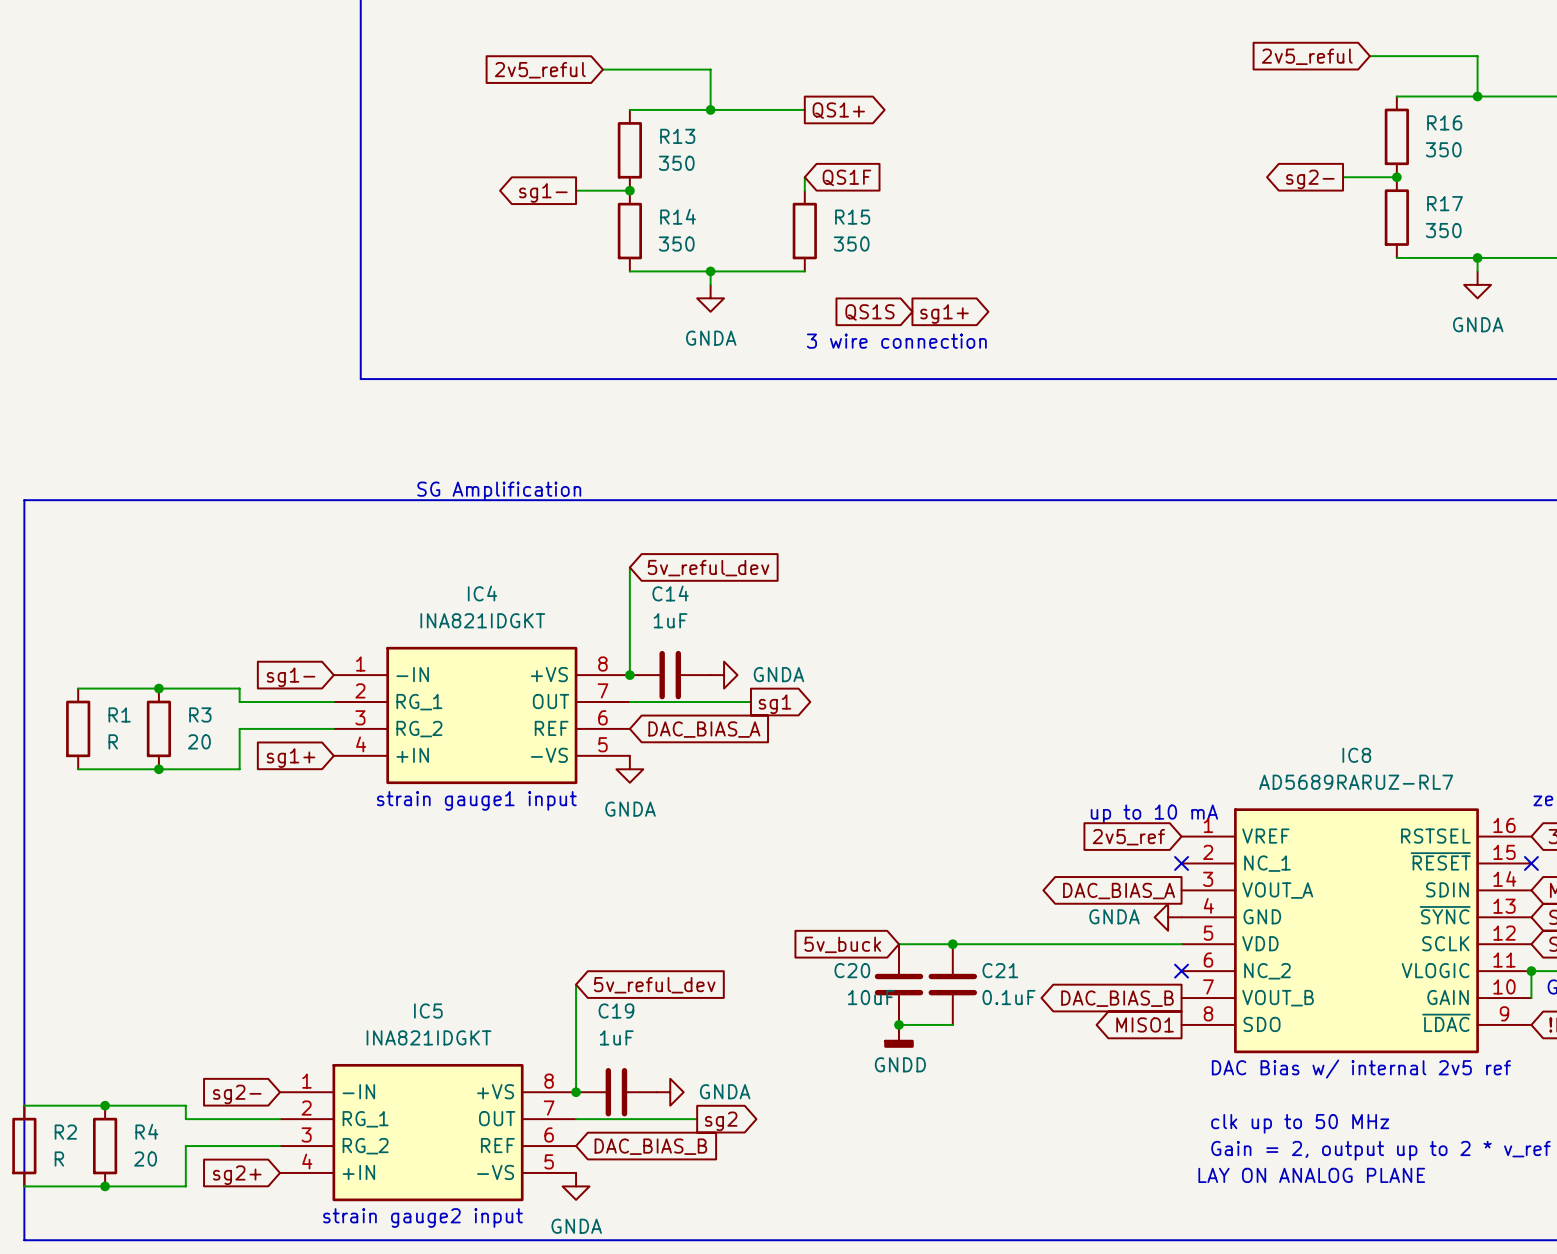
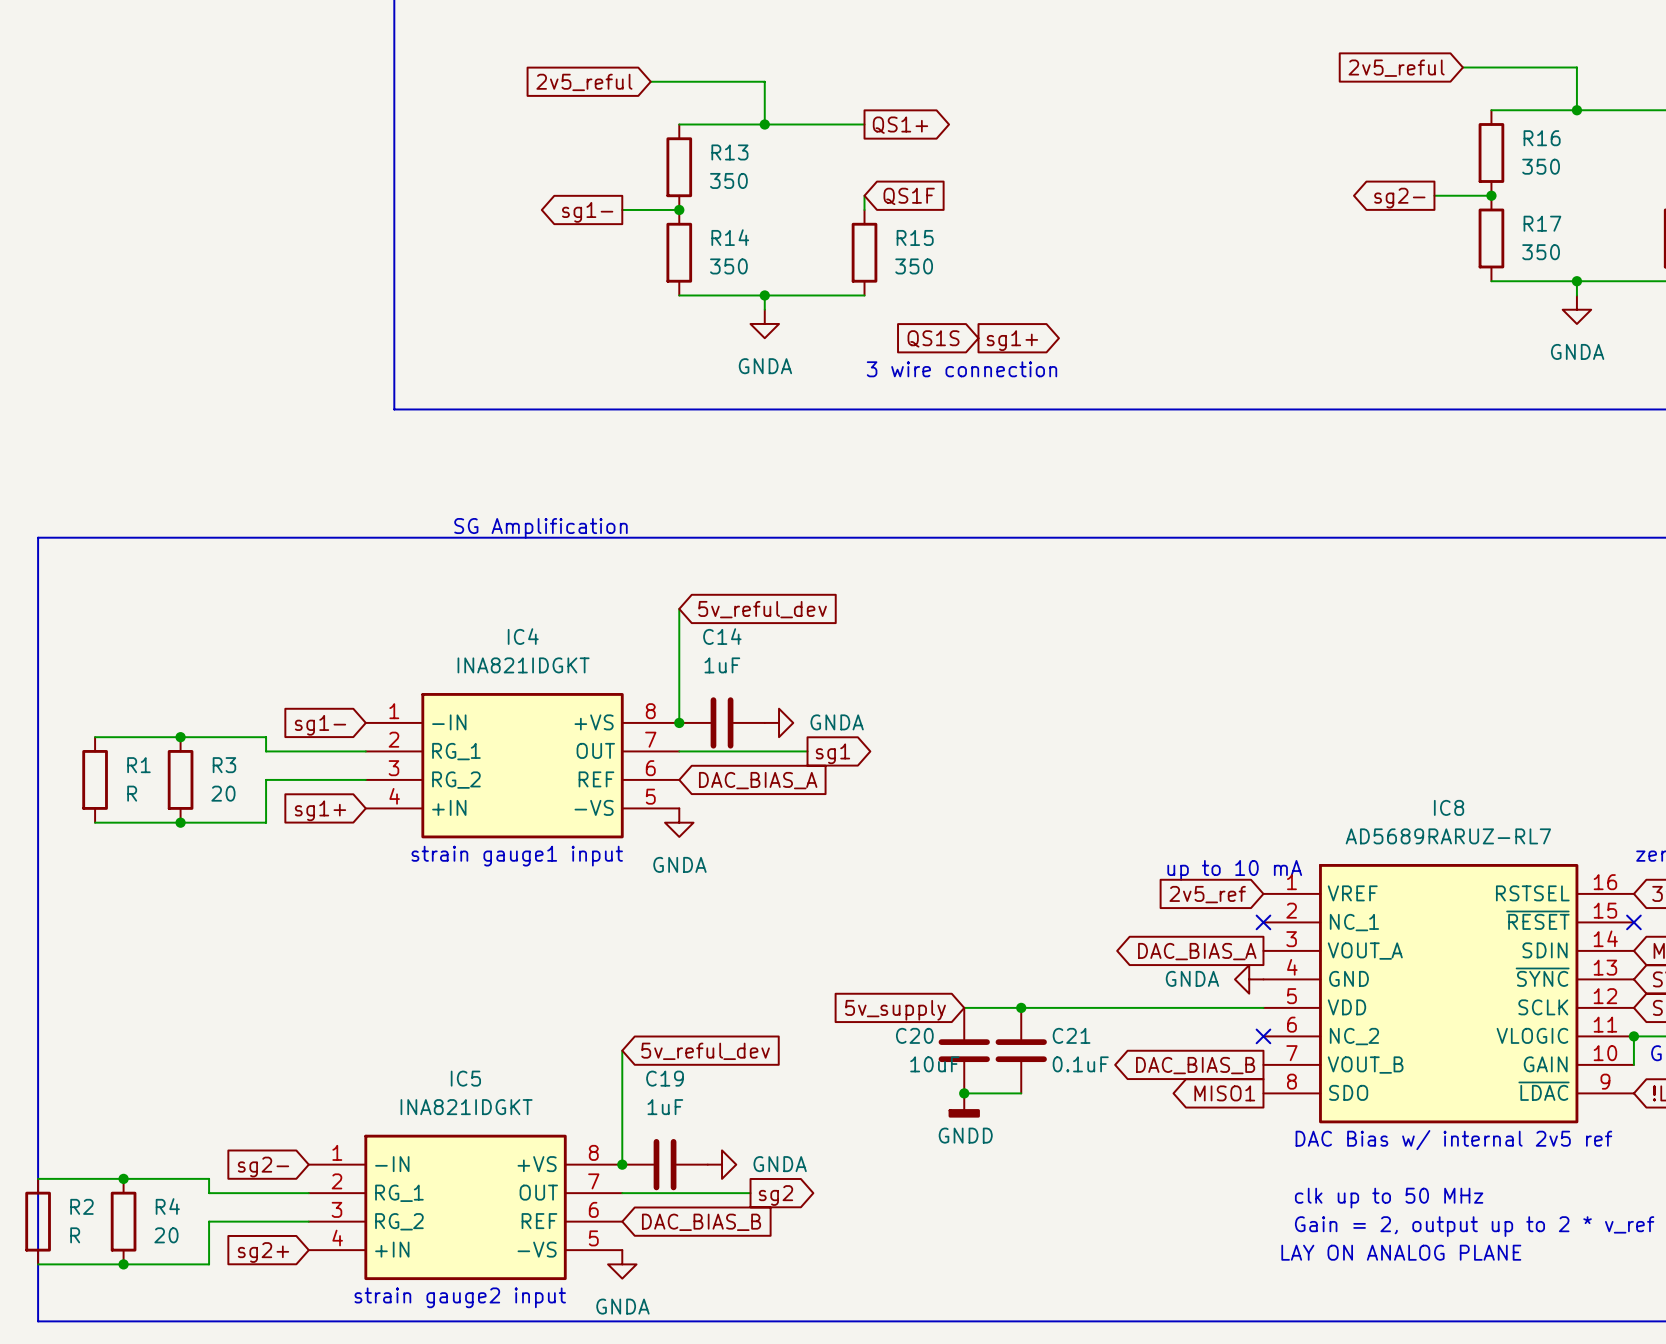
global label: 5v_buck (842, 944) -> 5v_supply (895, 1010)

